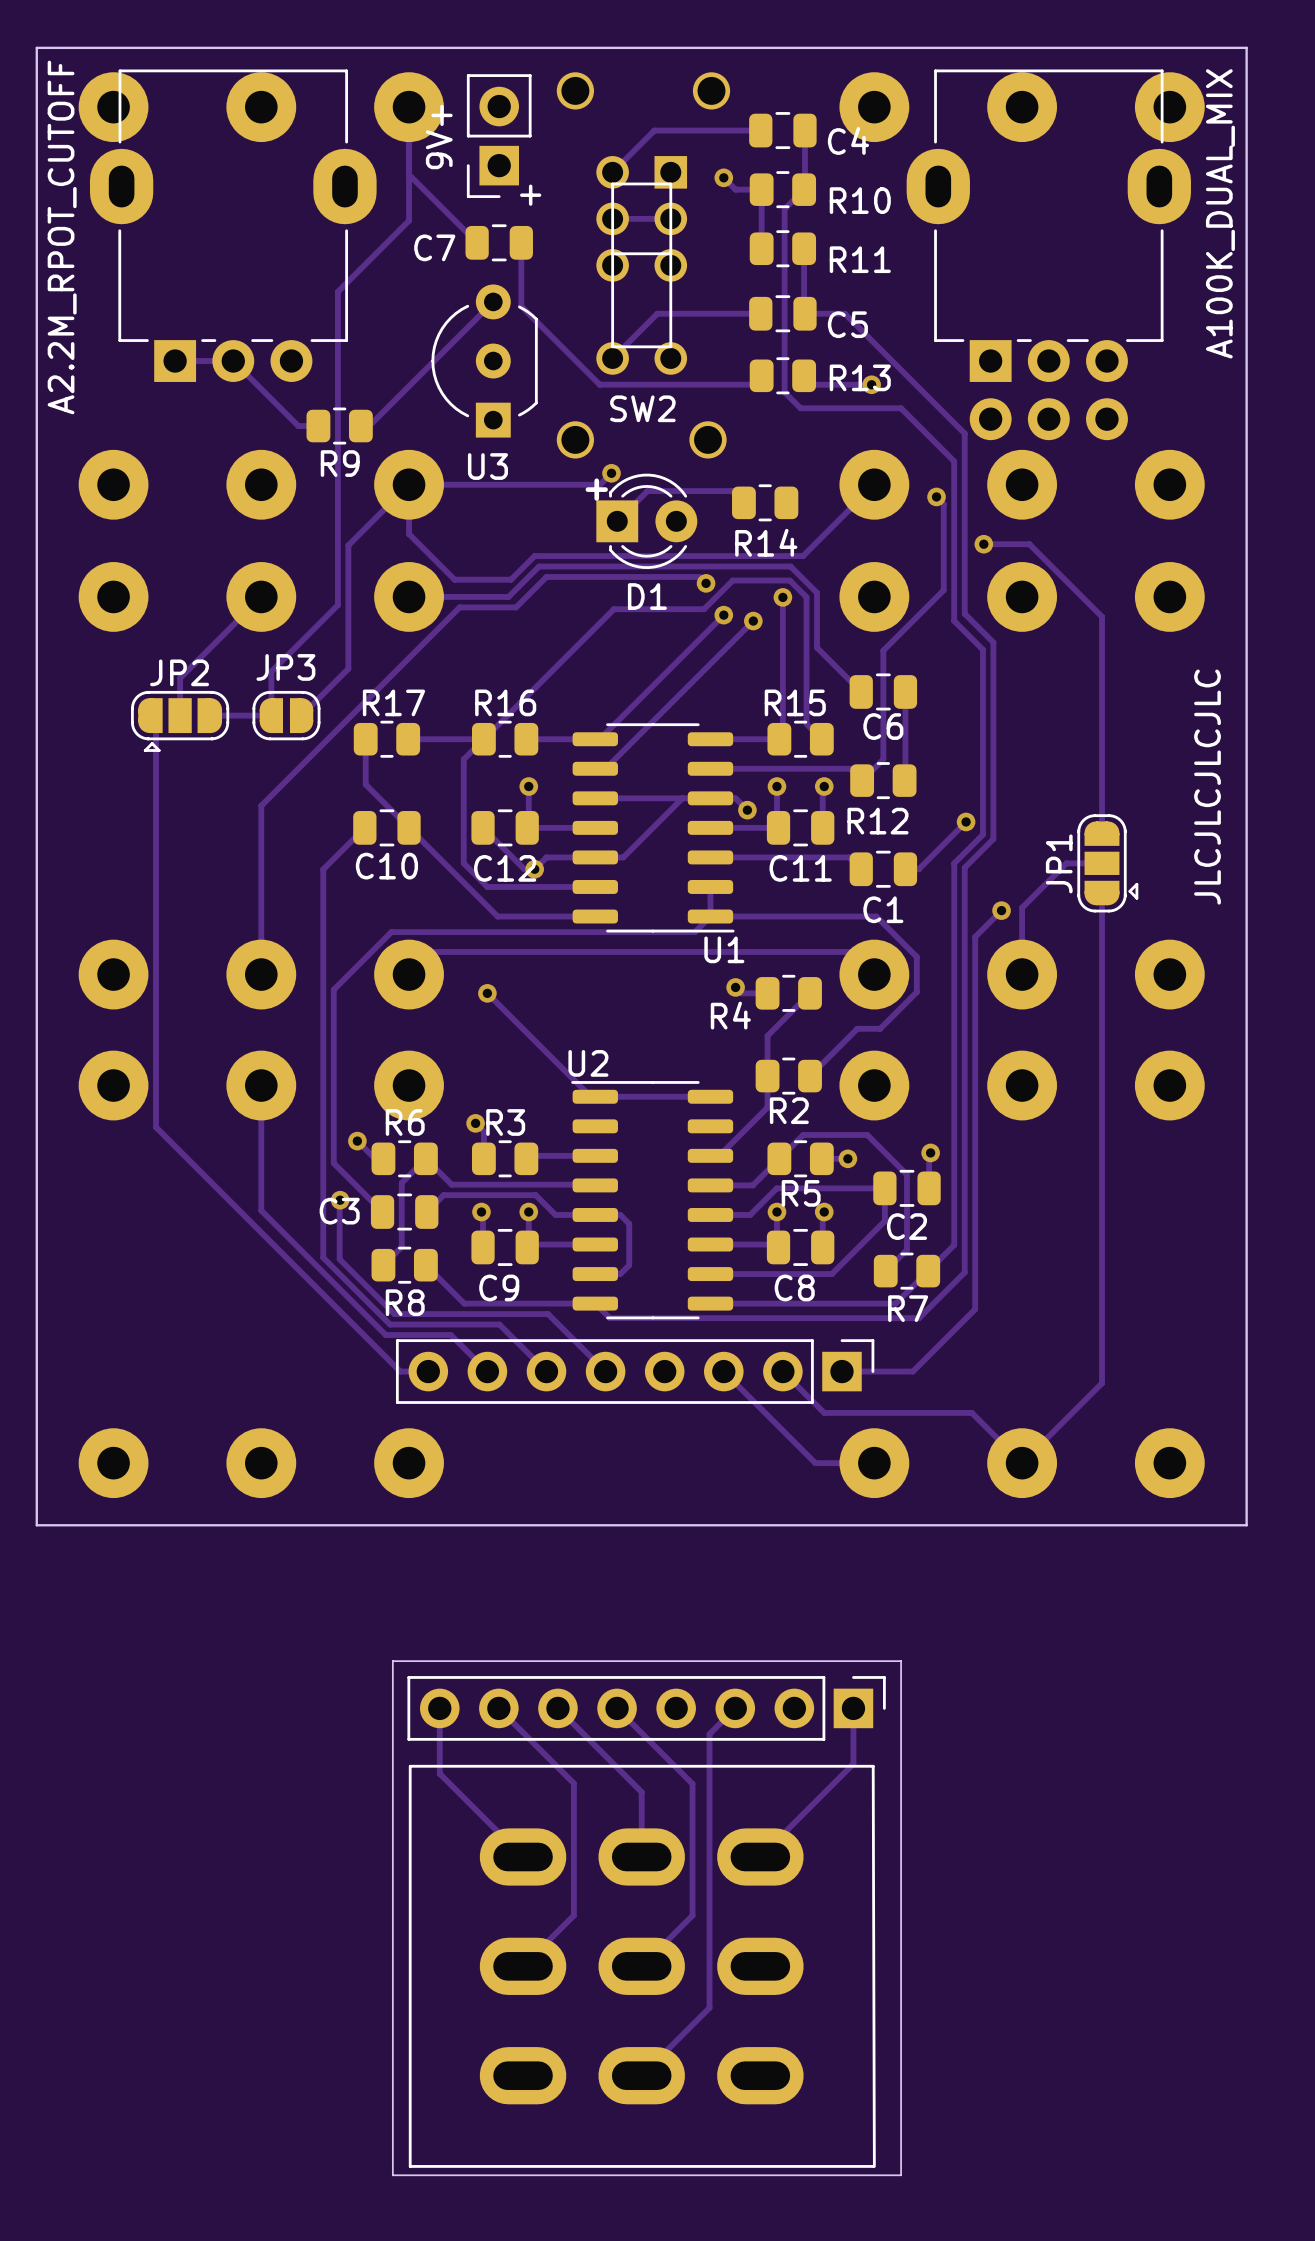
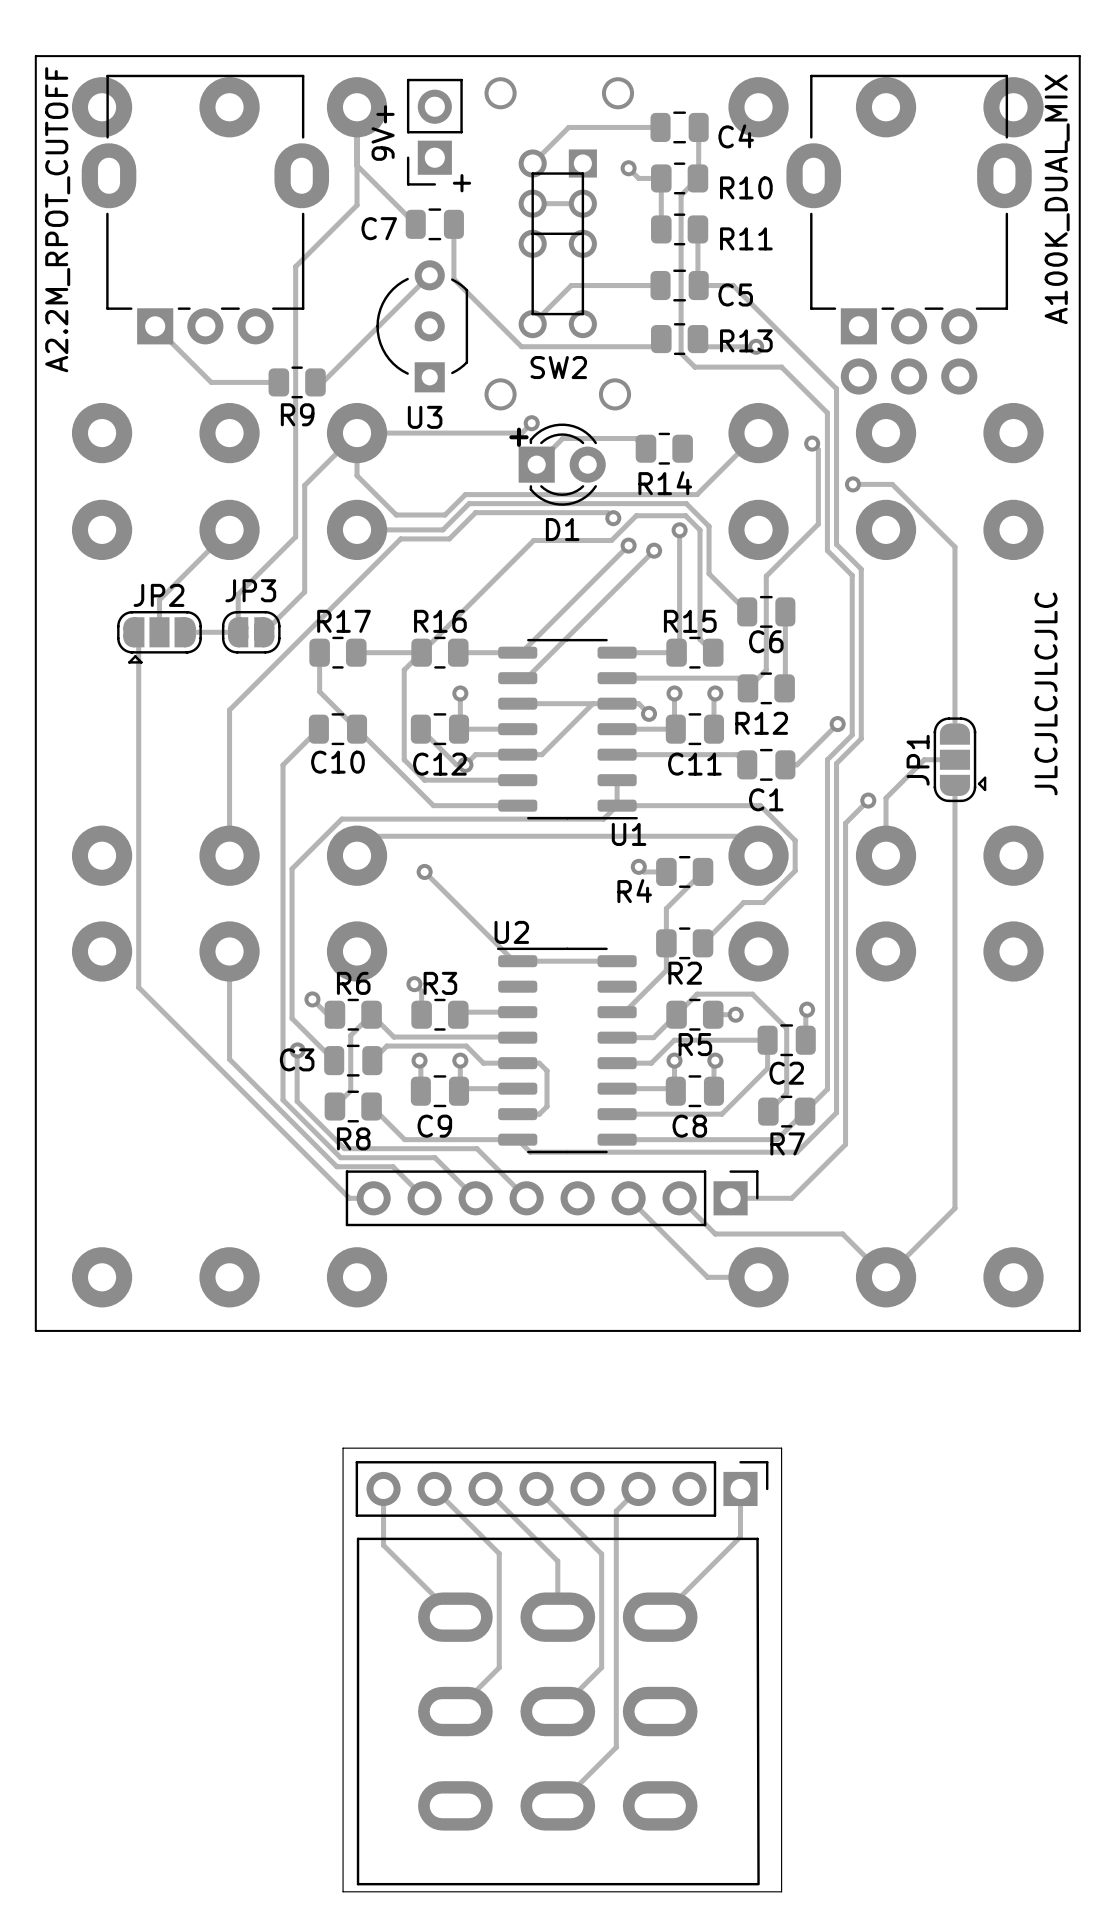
track: (175, 361) (233, 361) (298, 426) -> (155, 326) (211, 382) (261, 382)

